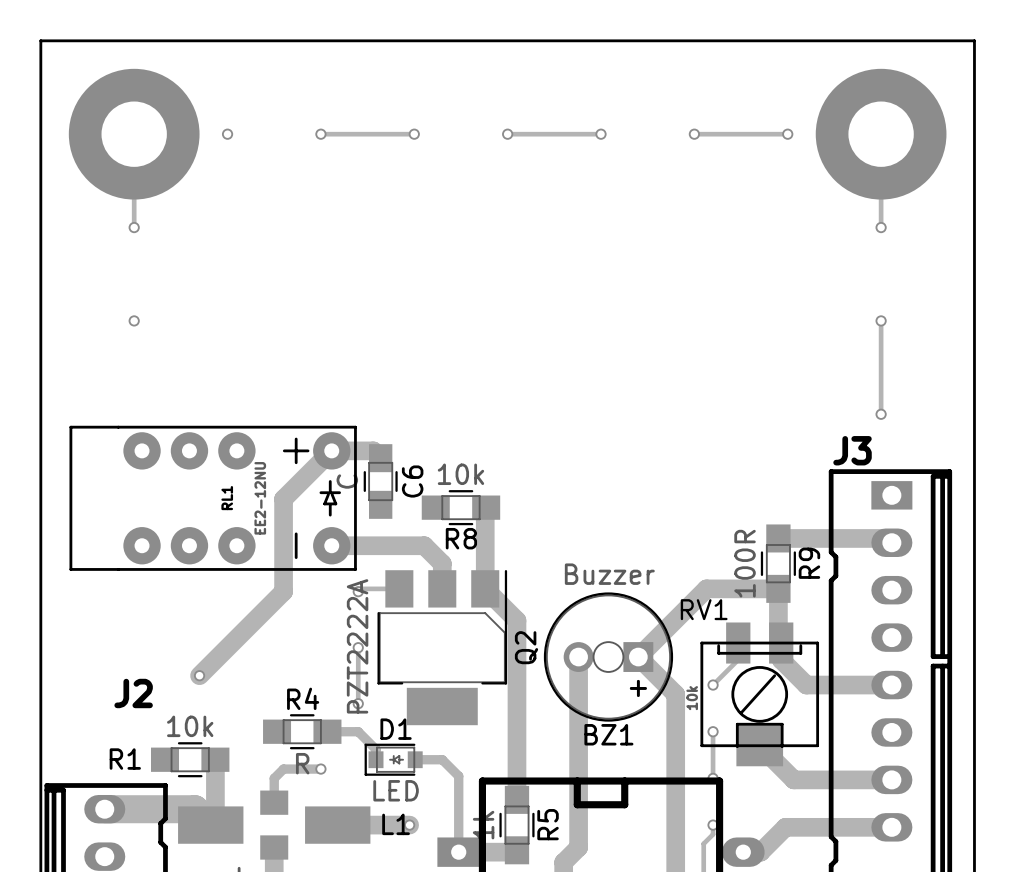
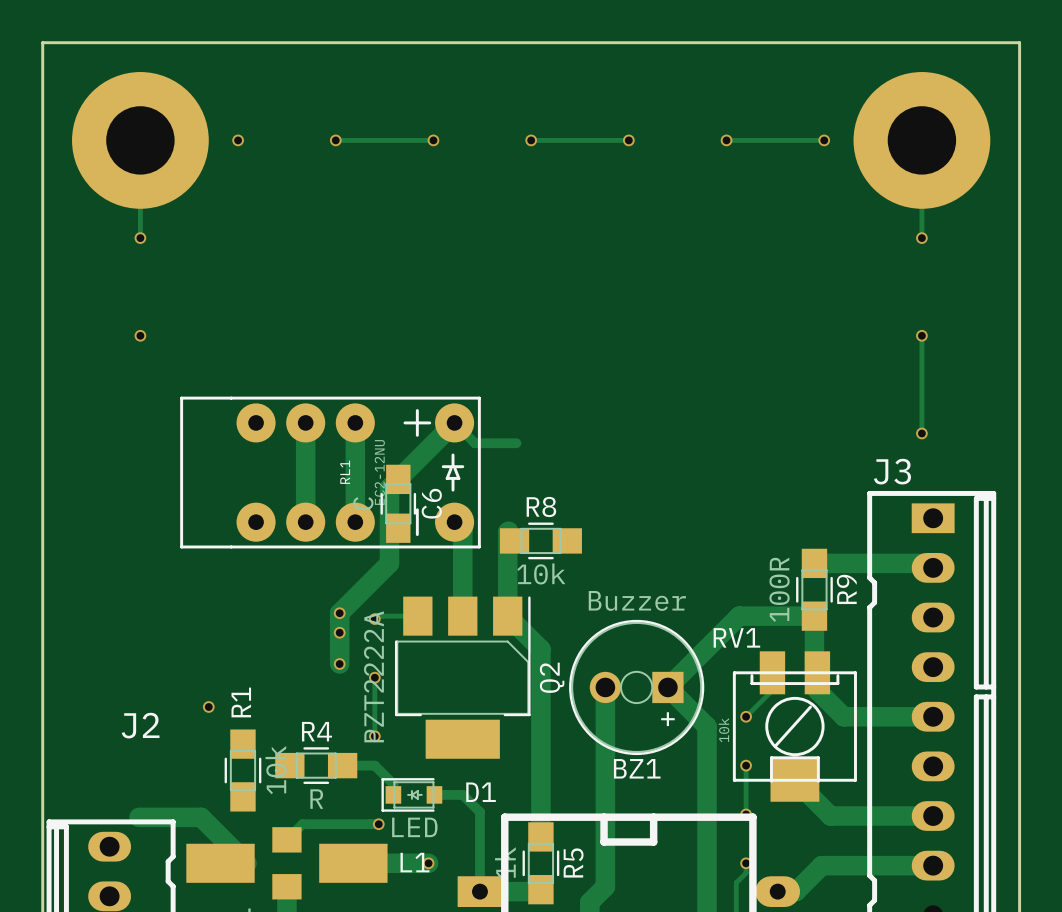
track: none -> (305, 422) (305, 522)
track: none -> (355, 422) (355, 522)
track: none -> (516, 443) (474, 443) (454, 422) (389, 487) (389, 563) (339, 613) (339, 664)
track: (380, 458) (373, 450) (331, 450) (283, 499) (283, 591) (199, 675) -> none
R8 value position: 10k (460, 474) -> 10k (541, 573)
RL1 position: (213, 498) -> (330, 472)
RL1 value: EE2-12NU (260, 498) -> EC2-12NU (379, 472)
R8 position: (460, 507) -> (540, 540)
R8 name position: R8 (461, 538) -> R8 (541, 506)
track: (331, 545) (424, 545) (442, 563) -> (454, 522) (462, 530) (462, 589)
via: none -> (339, 613)
via: none -> (339, 632)
via: none -> (339, 664)
D1 name position: D1 (396, 729) -> D1 (481, 792)
R1 rotation: 0° (190, 759) -> 90° clockwise (242, 770)
R1 position: (190, 759) -> (242, 770)
track: (215, 759) (215, 820) (210, 825) (194, 809) (104, 809) -> none
track: (320, 769) (283, 769) (274, 778) (274, 802) -> none
via position: (320, 769) -> (378, 824)
track: none -> (138, 817) (201, 817) (247, 863)
track: none -> (378, 824) (302, 824) (289, 836)

